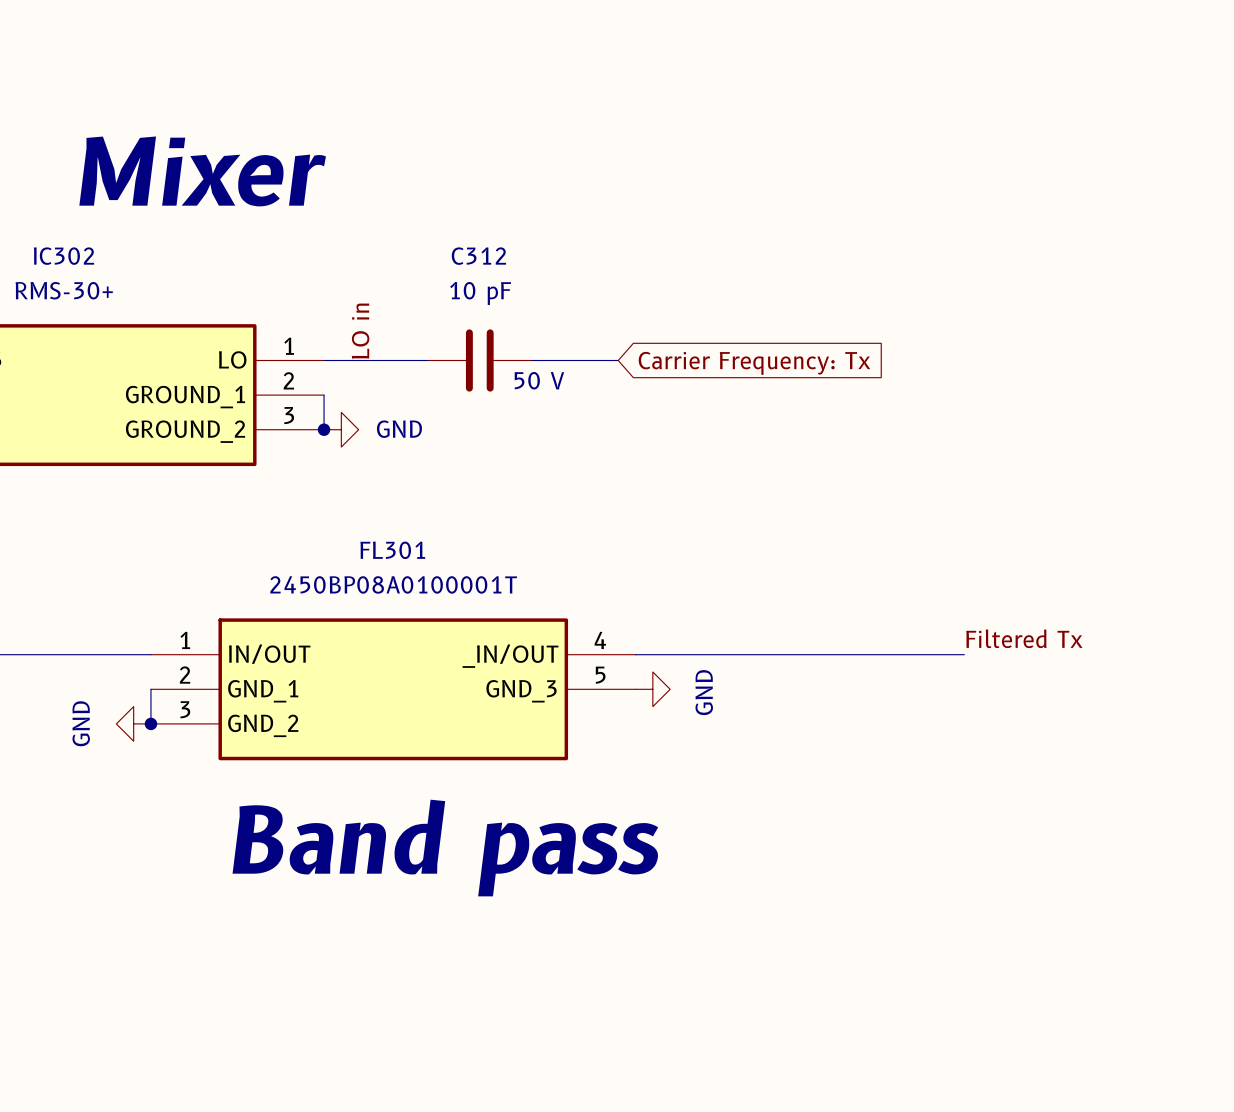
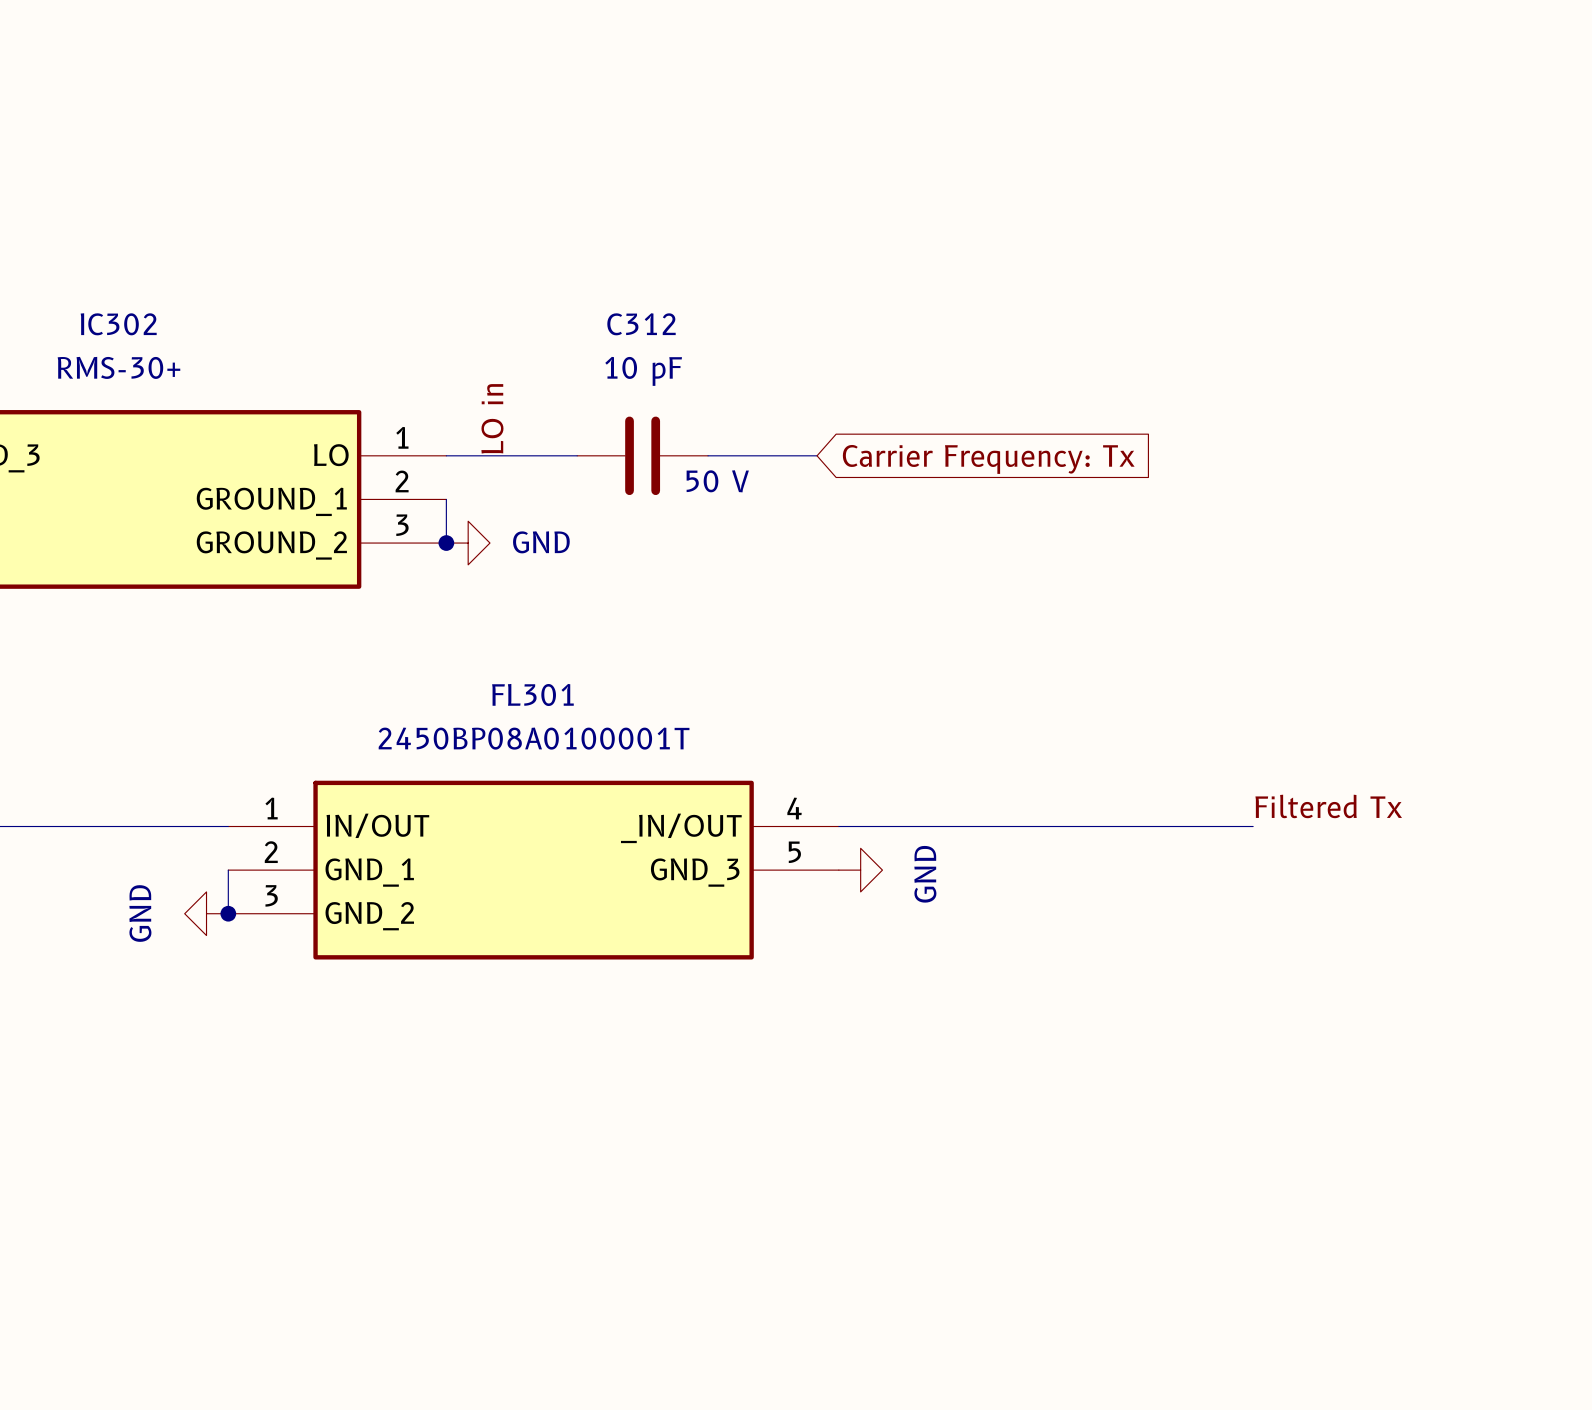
text: Mixer (202, 171) -> none
text: Band pass (445, 848) -> none

